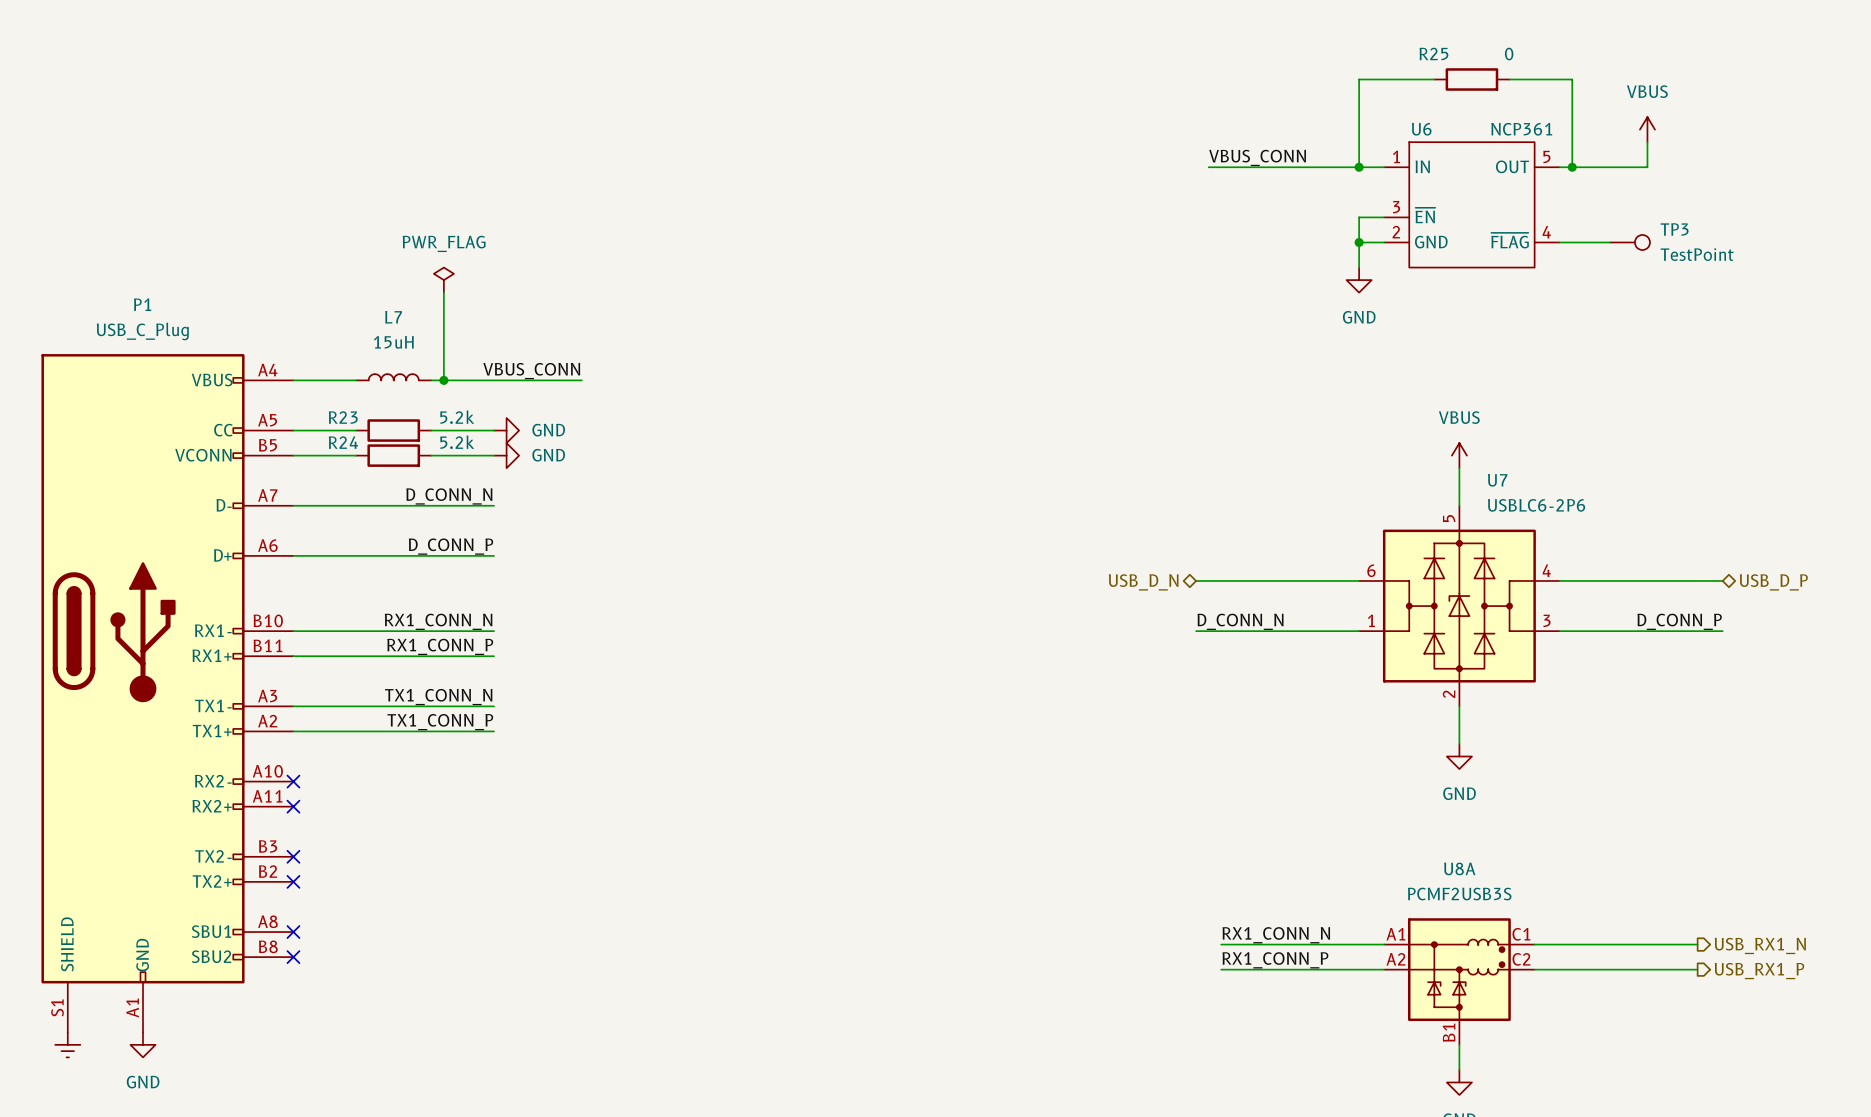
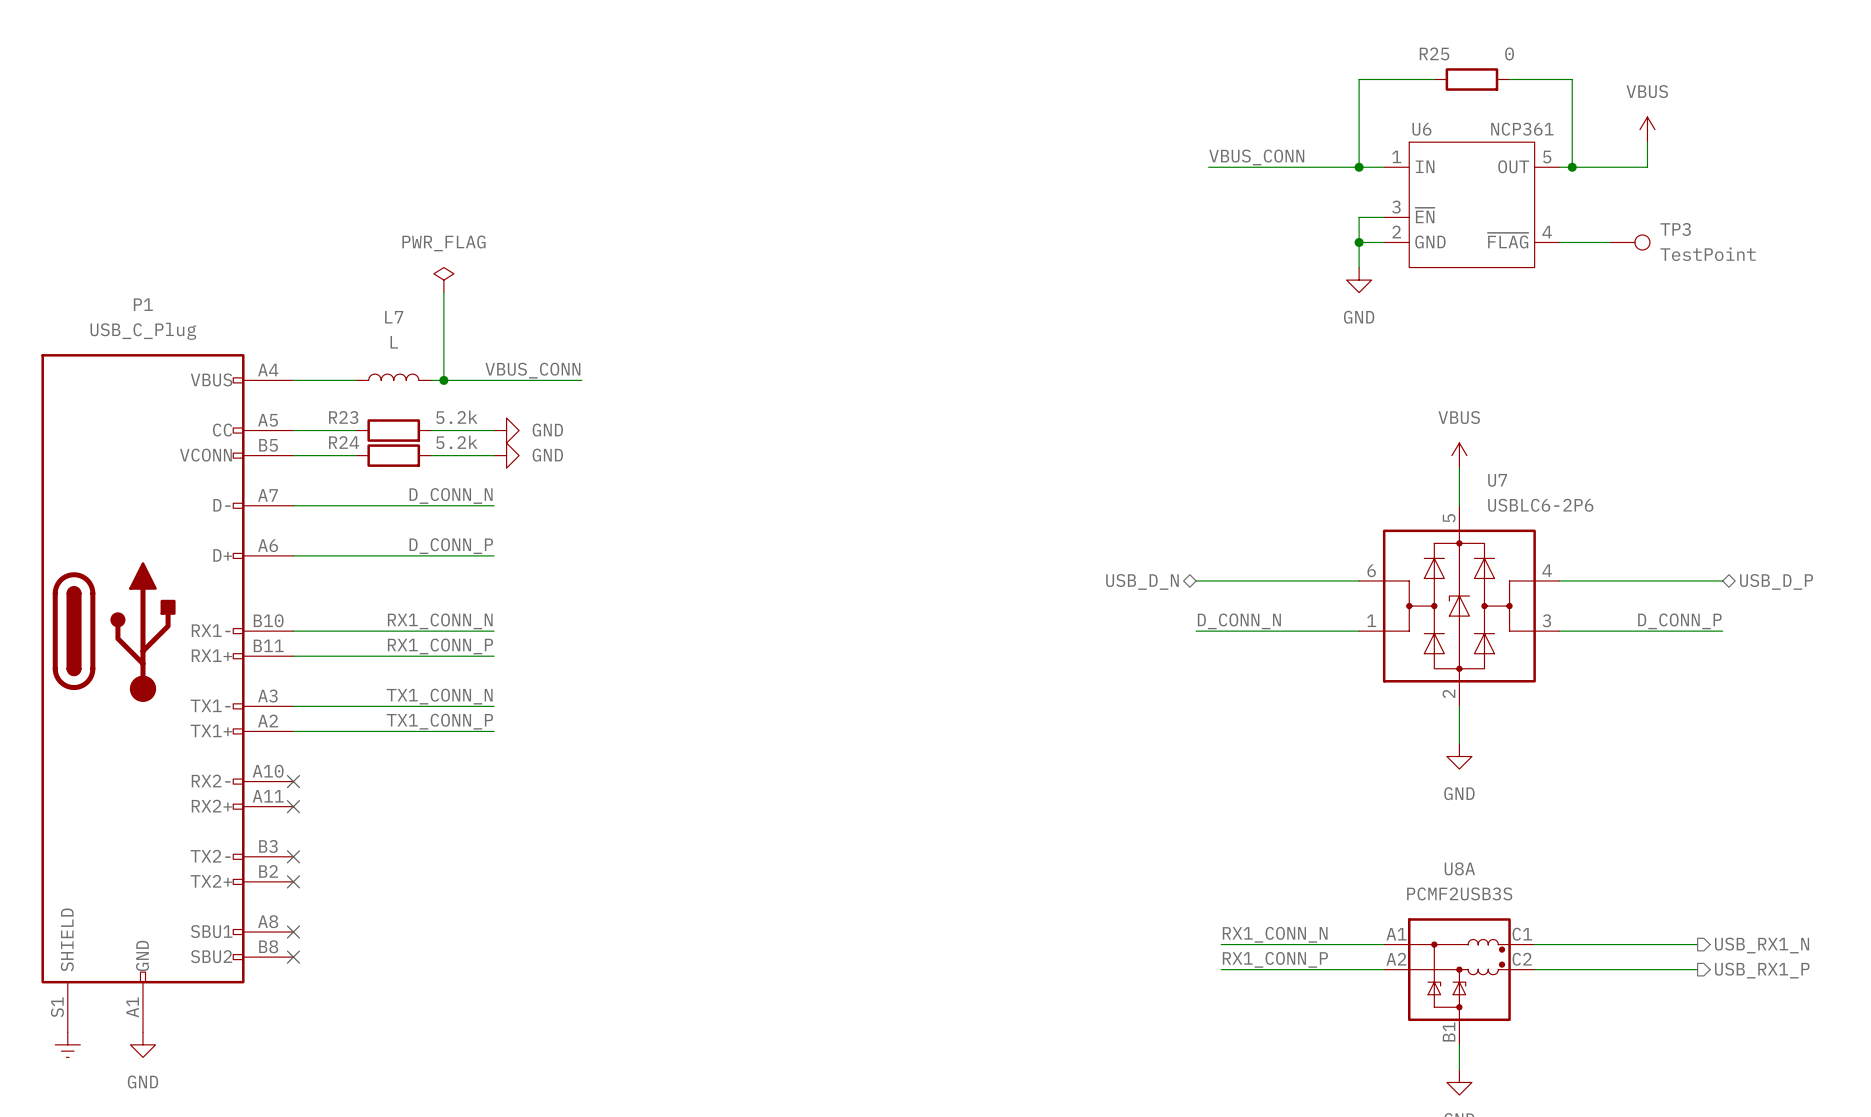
L7 value: 15uH (393, 342) -> L (394, 342)

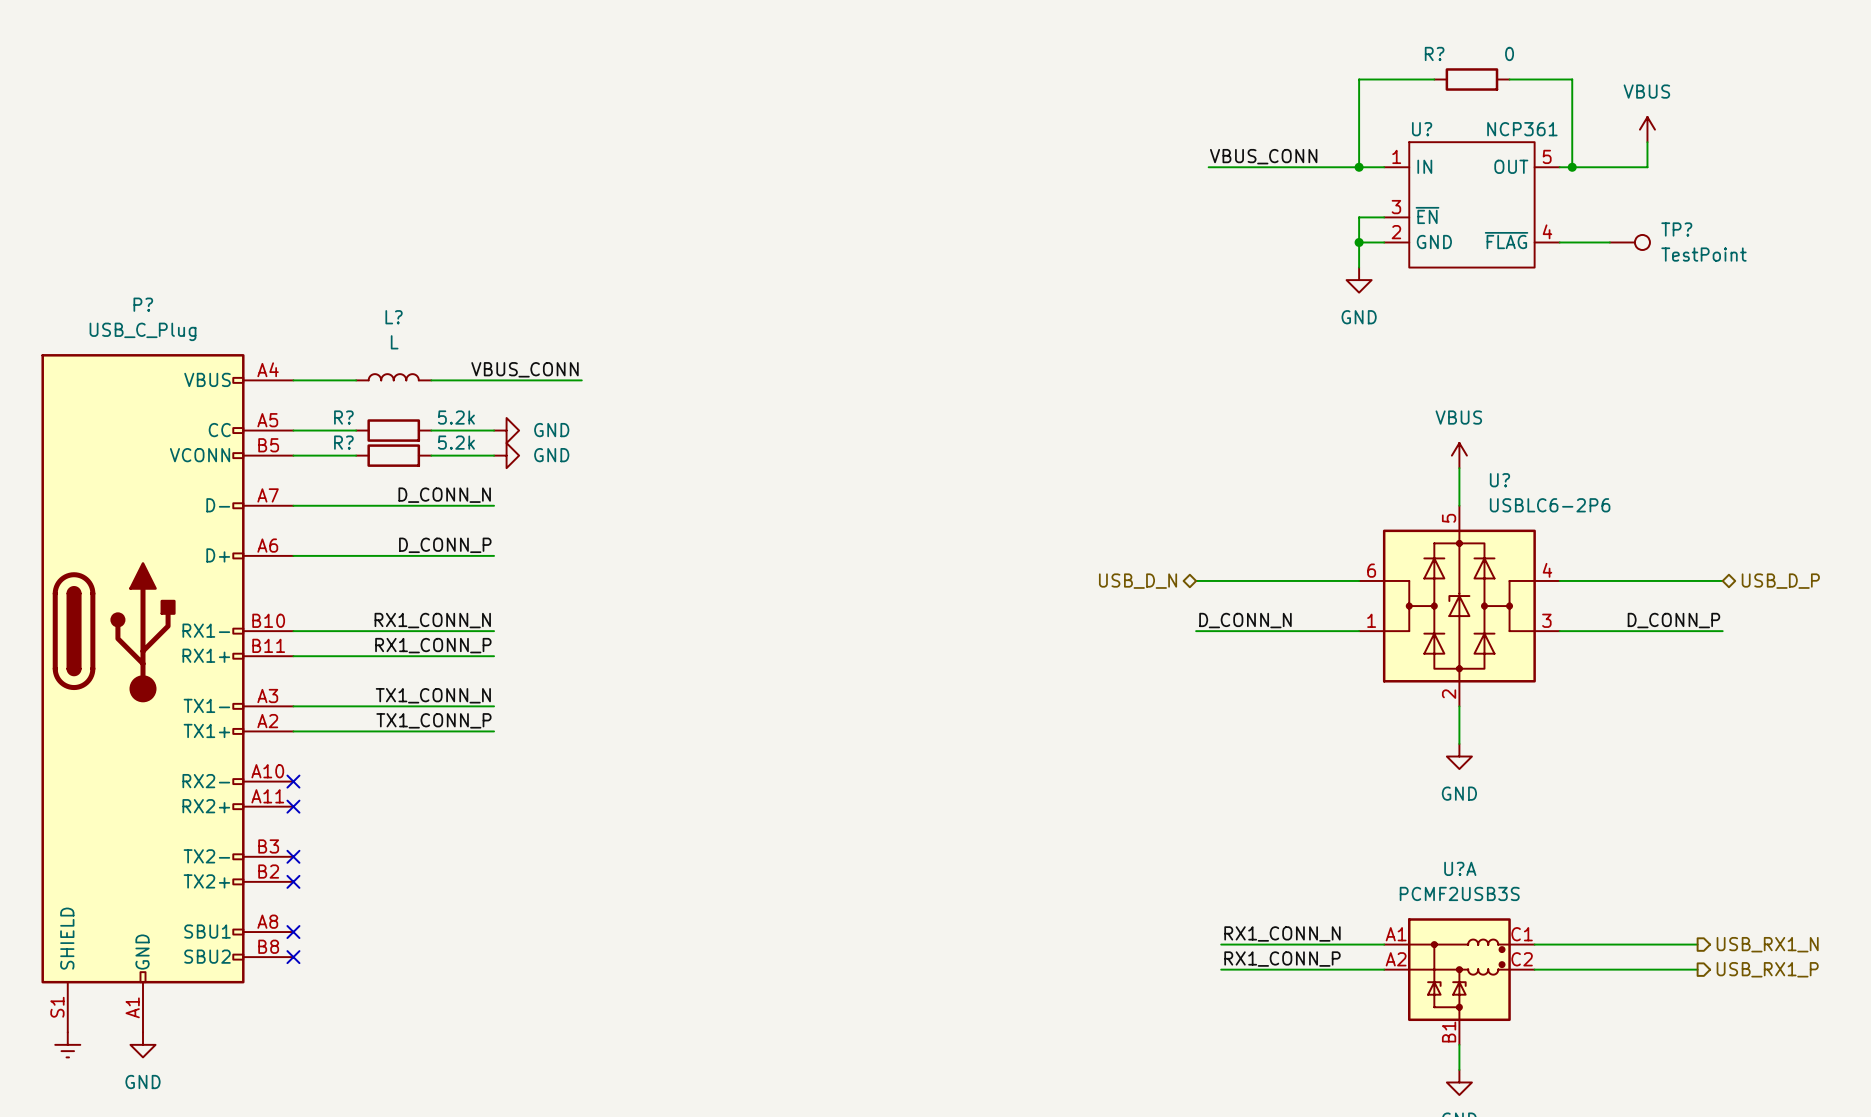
R25 name: R25 (1434, 53) -> R? (1434, 53)
U6 name: U6 (1421, 129) -> U? (1422, 129)
TP3 name: TP3 (1675, 229) -> TP? (1676, 229)
power symbol: PWR_FLAG (443, 280) -> none
wire: (443, 292) (443, 380) -> none
P1 name: P1 (143, 304) -> P? (143, 304)
L7 name: L7 (394, 317) -> L? (394, 317)
junction: (443, 380) -> none
R23 name: R23 (343, 417) -> R? (343, 417)
R24 name: R24 (344, 442) -> R? (343, 442)
U7 name: U7 (1497, 480) -> U? (1499, 480)
U8A name: U8A (1459, 868) -> U?A (1460, 868)

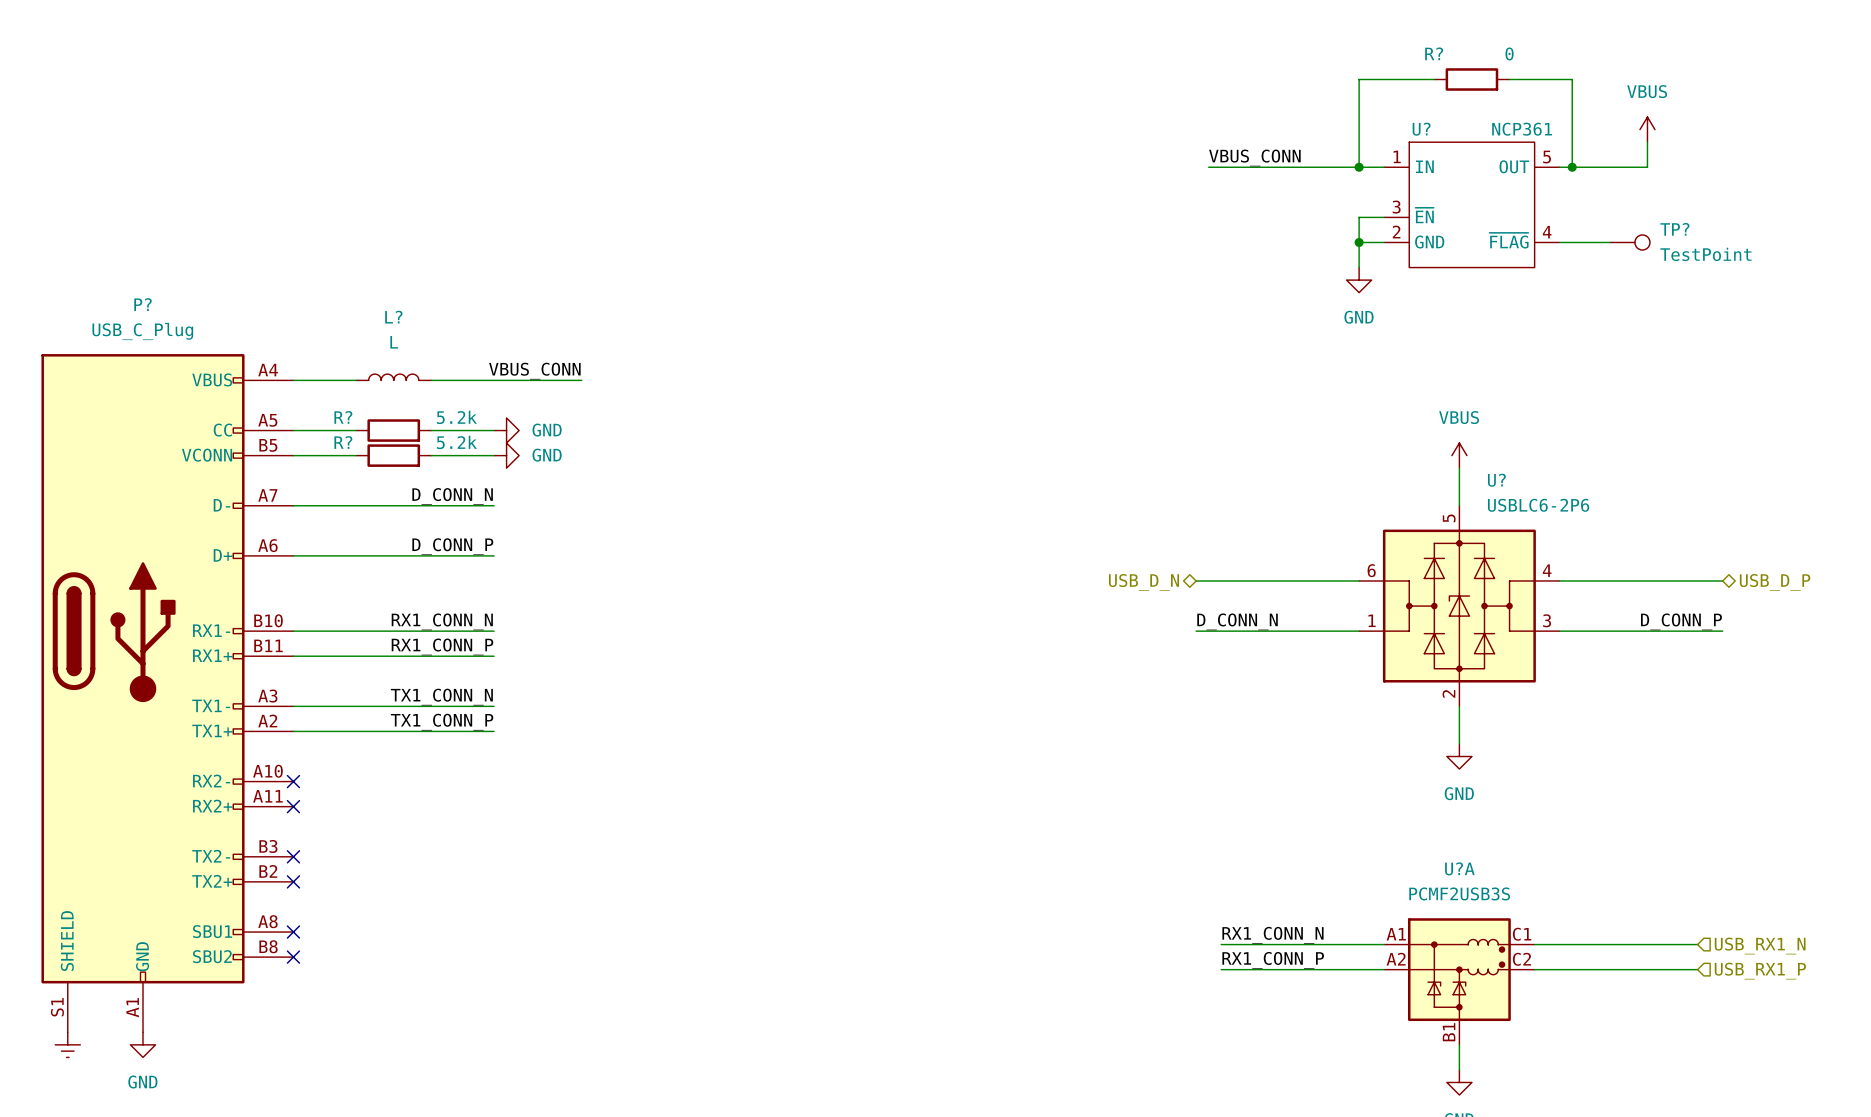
hierarchical label shape: output (1767, 944) -> input (1760, 946)
hierarchical label shape: output (1767, 969) -> input (1760, 971)

